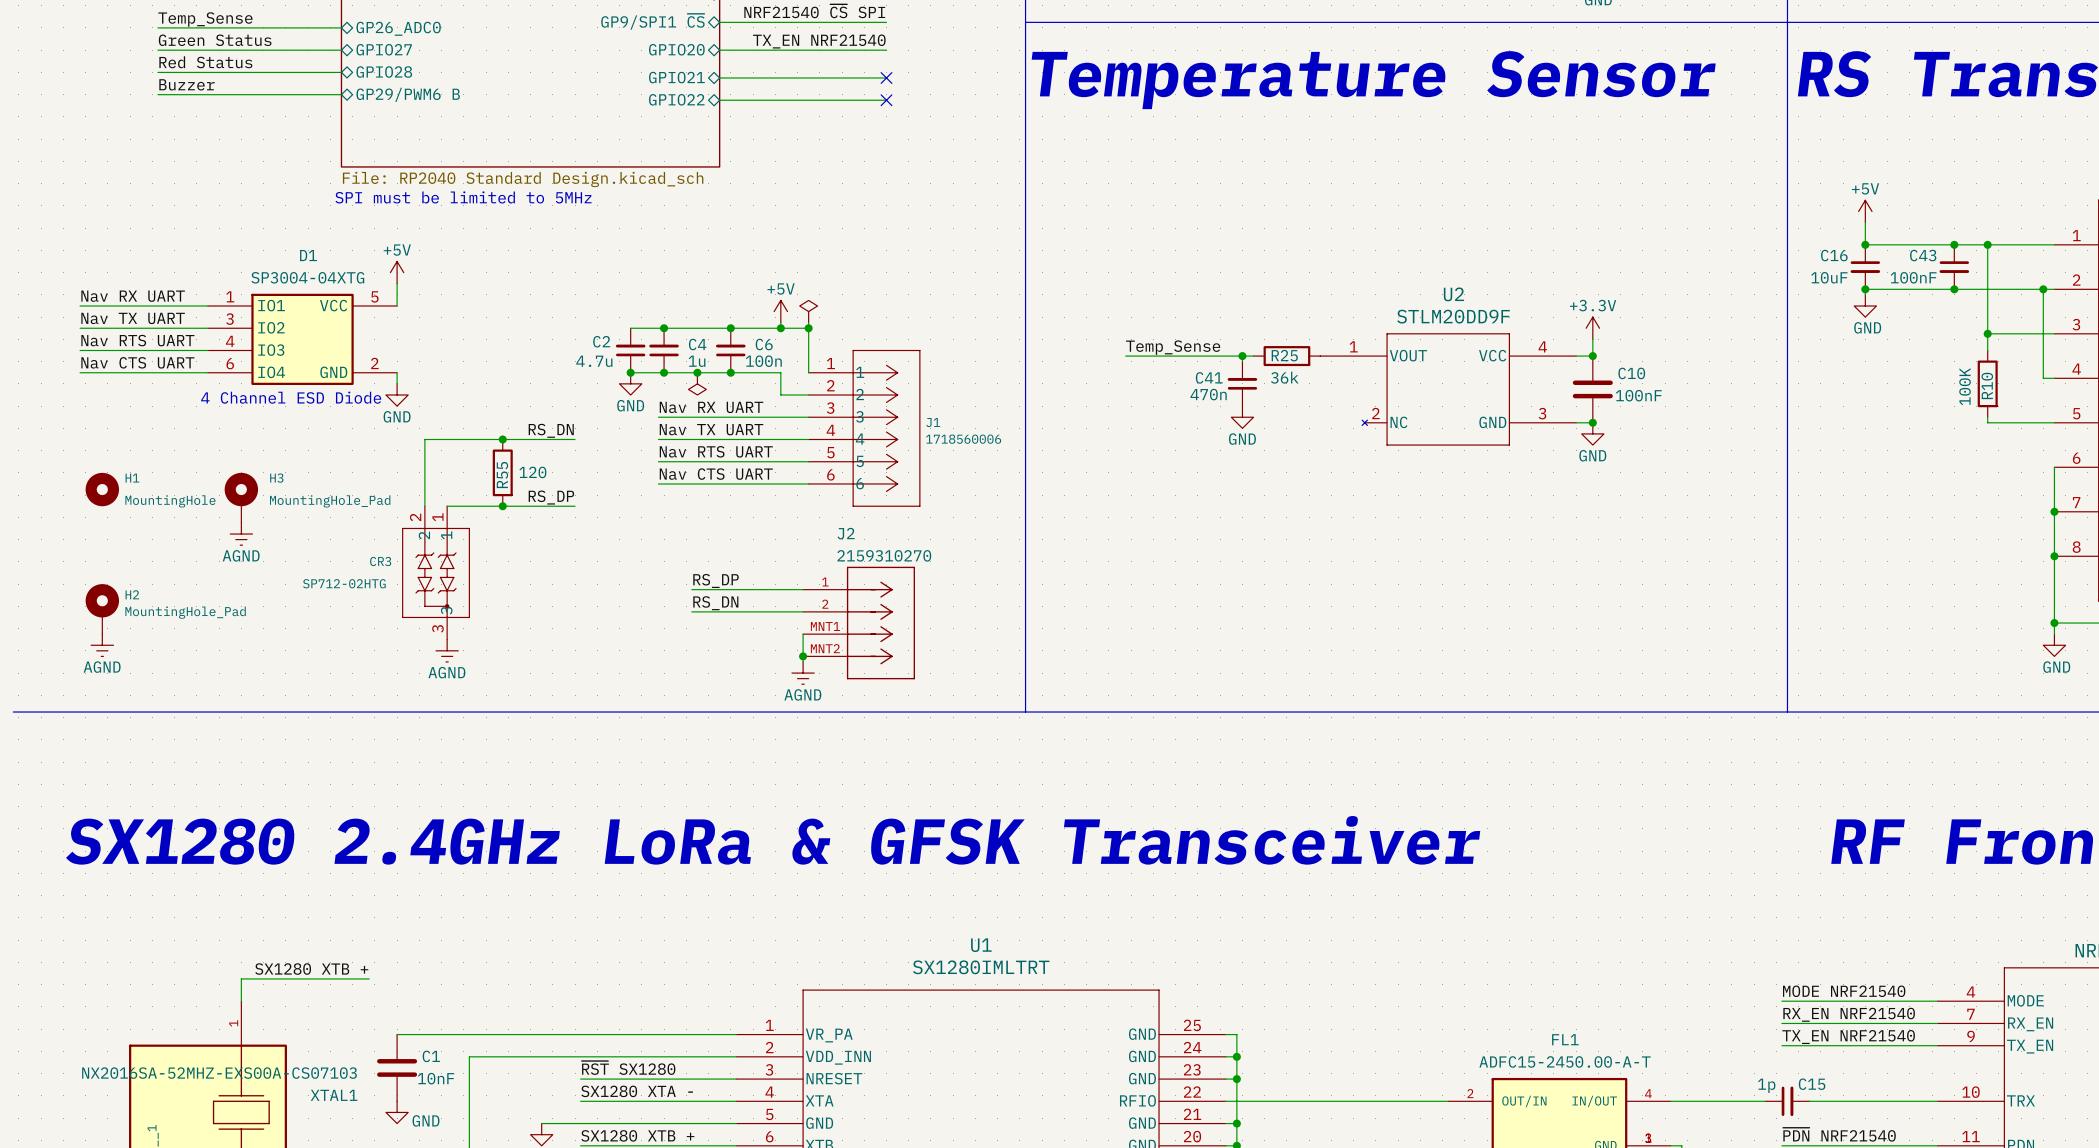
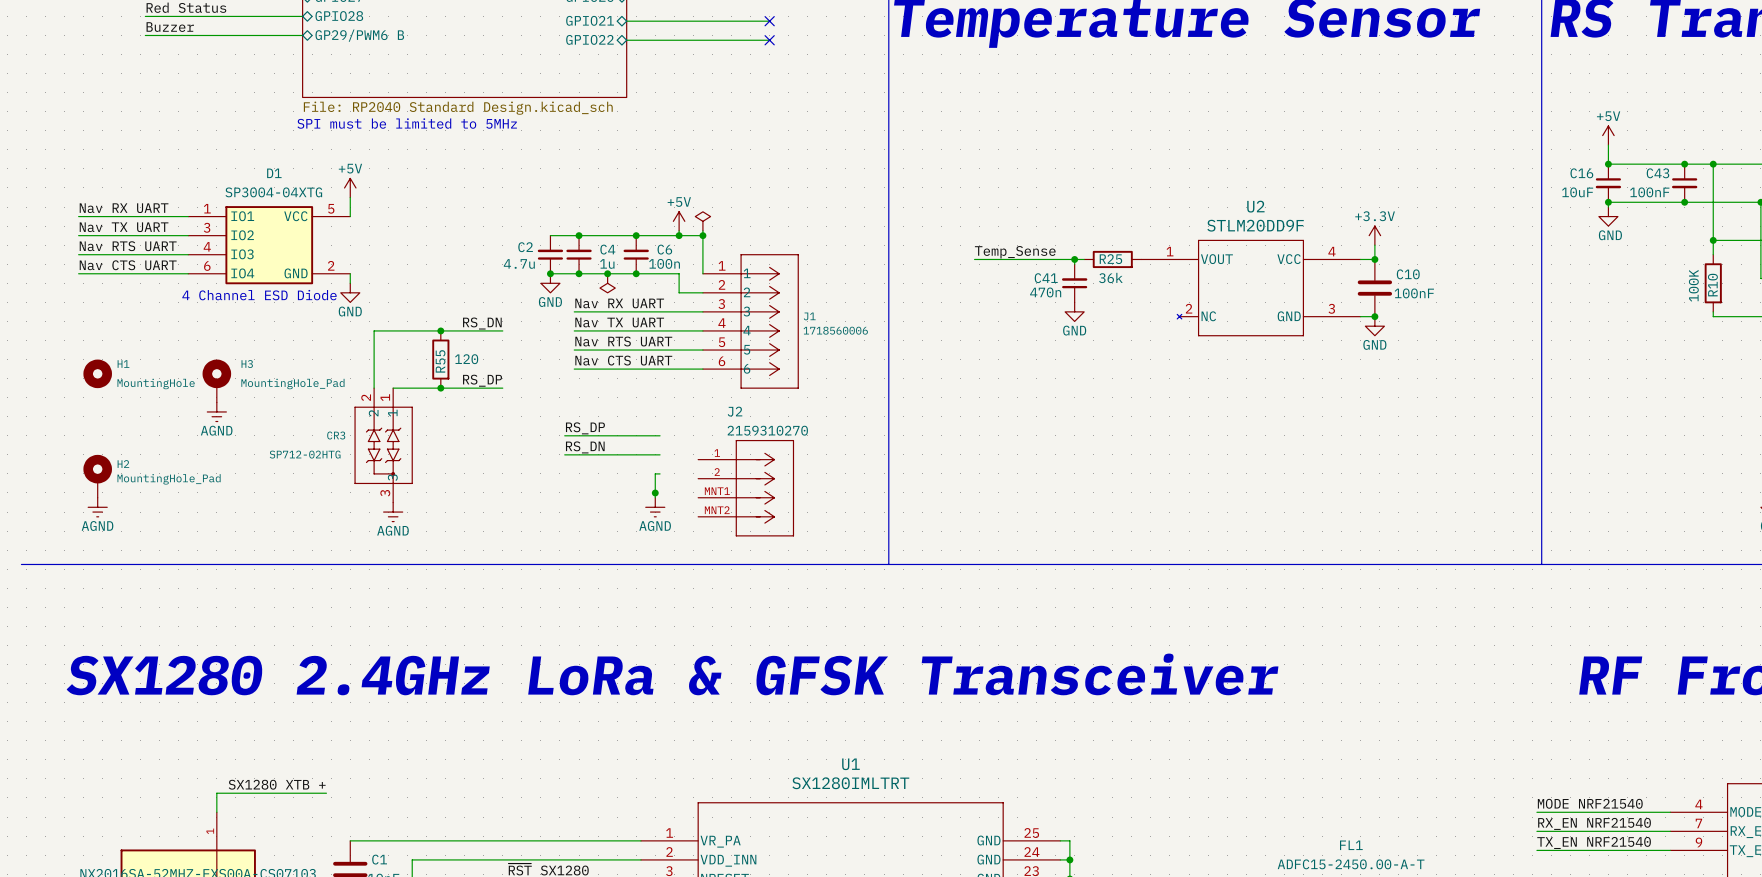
label position: RS_DP (716, 580) -> RS_DP (585, 428)
wire: (691, 589) (803, 589) -> (564, 435) (660, 435)
label position: RS_DN (715, 603) -> RS_DN (585, 447)
wire: none -> (660, 473) (655, 473) (655, 497)
wire: (691, 611) (803, 611) -> (564, 454) (660, 454)
junction: none -> (655, 492)
wire: (803, 634) (803, 661) -> none
junction: (803, 656) -> none
power symbol position: AGND (803, 673) -> AGND (655, 507)

